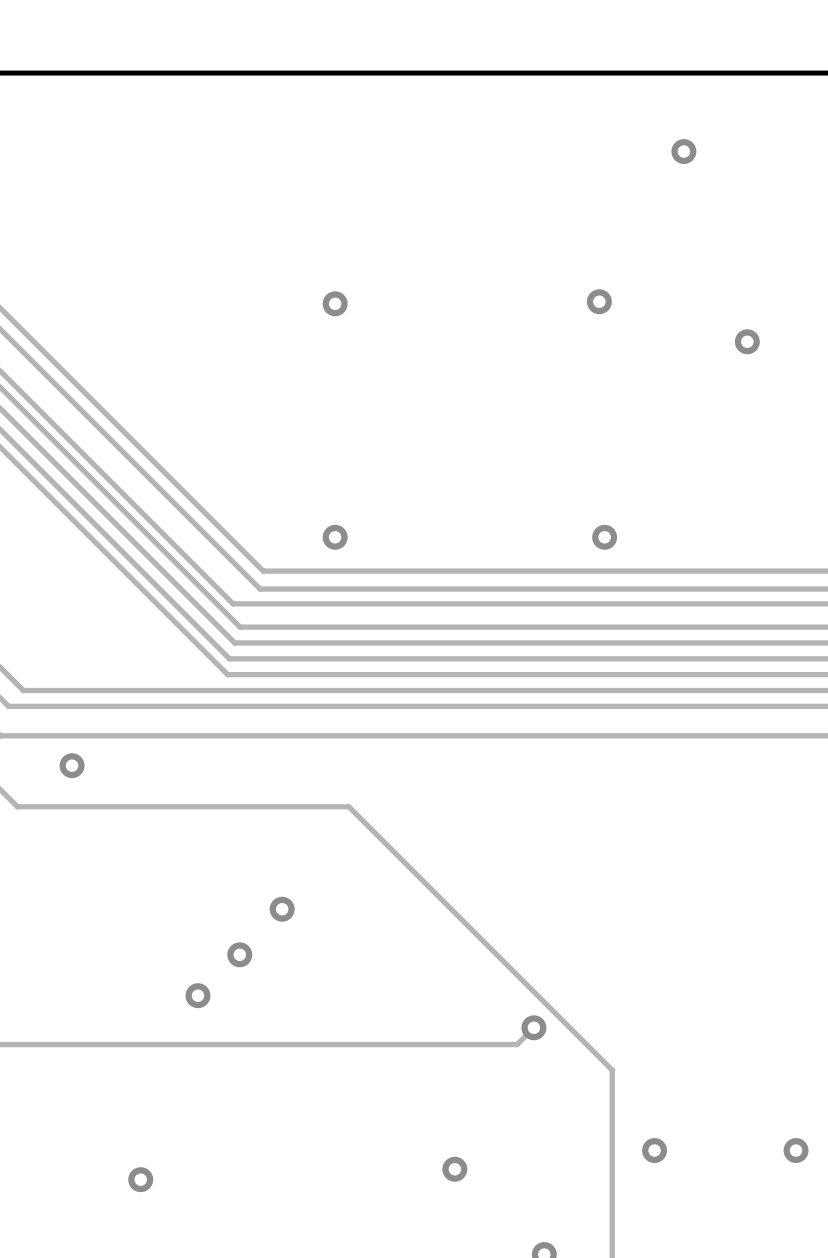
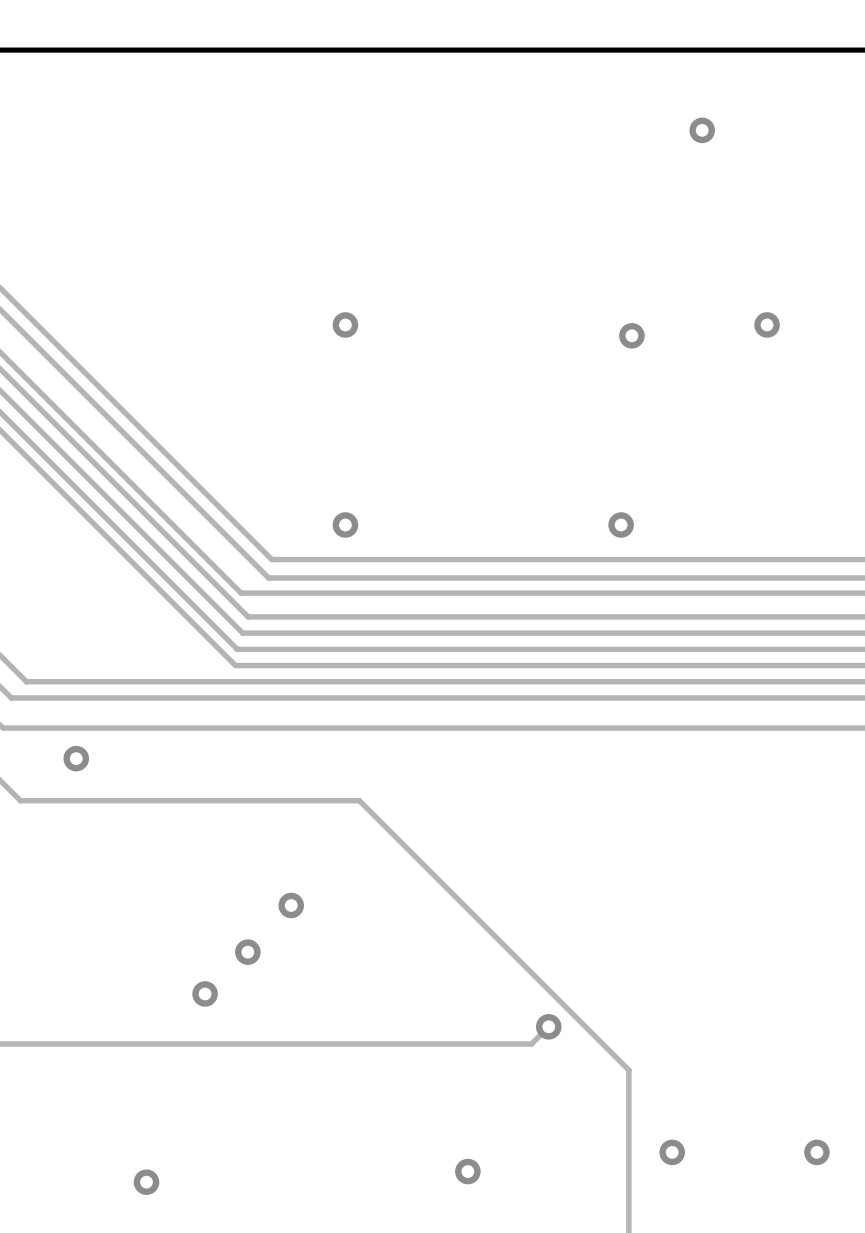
via position: (599, 301) -> (631, 335)
via position: (335, 303) -> (345, 324)

